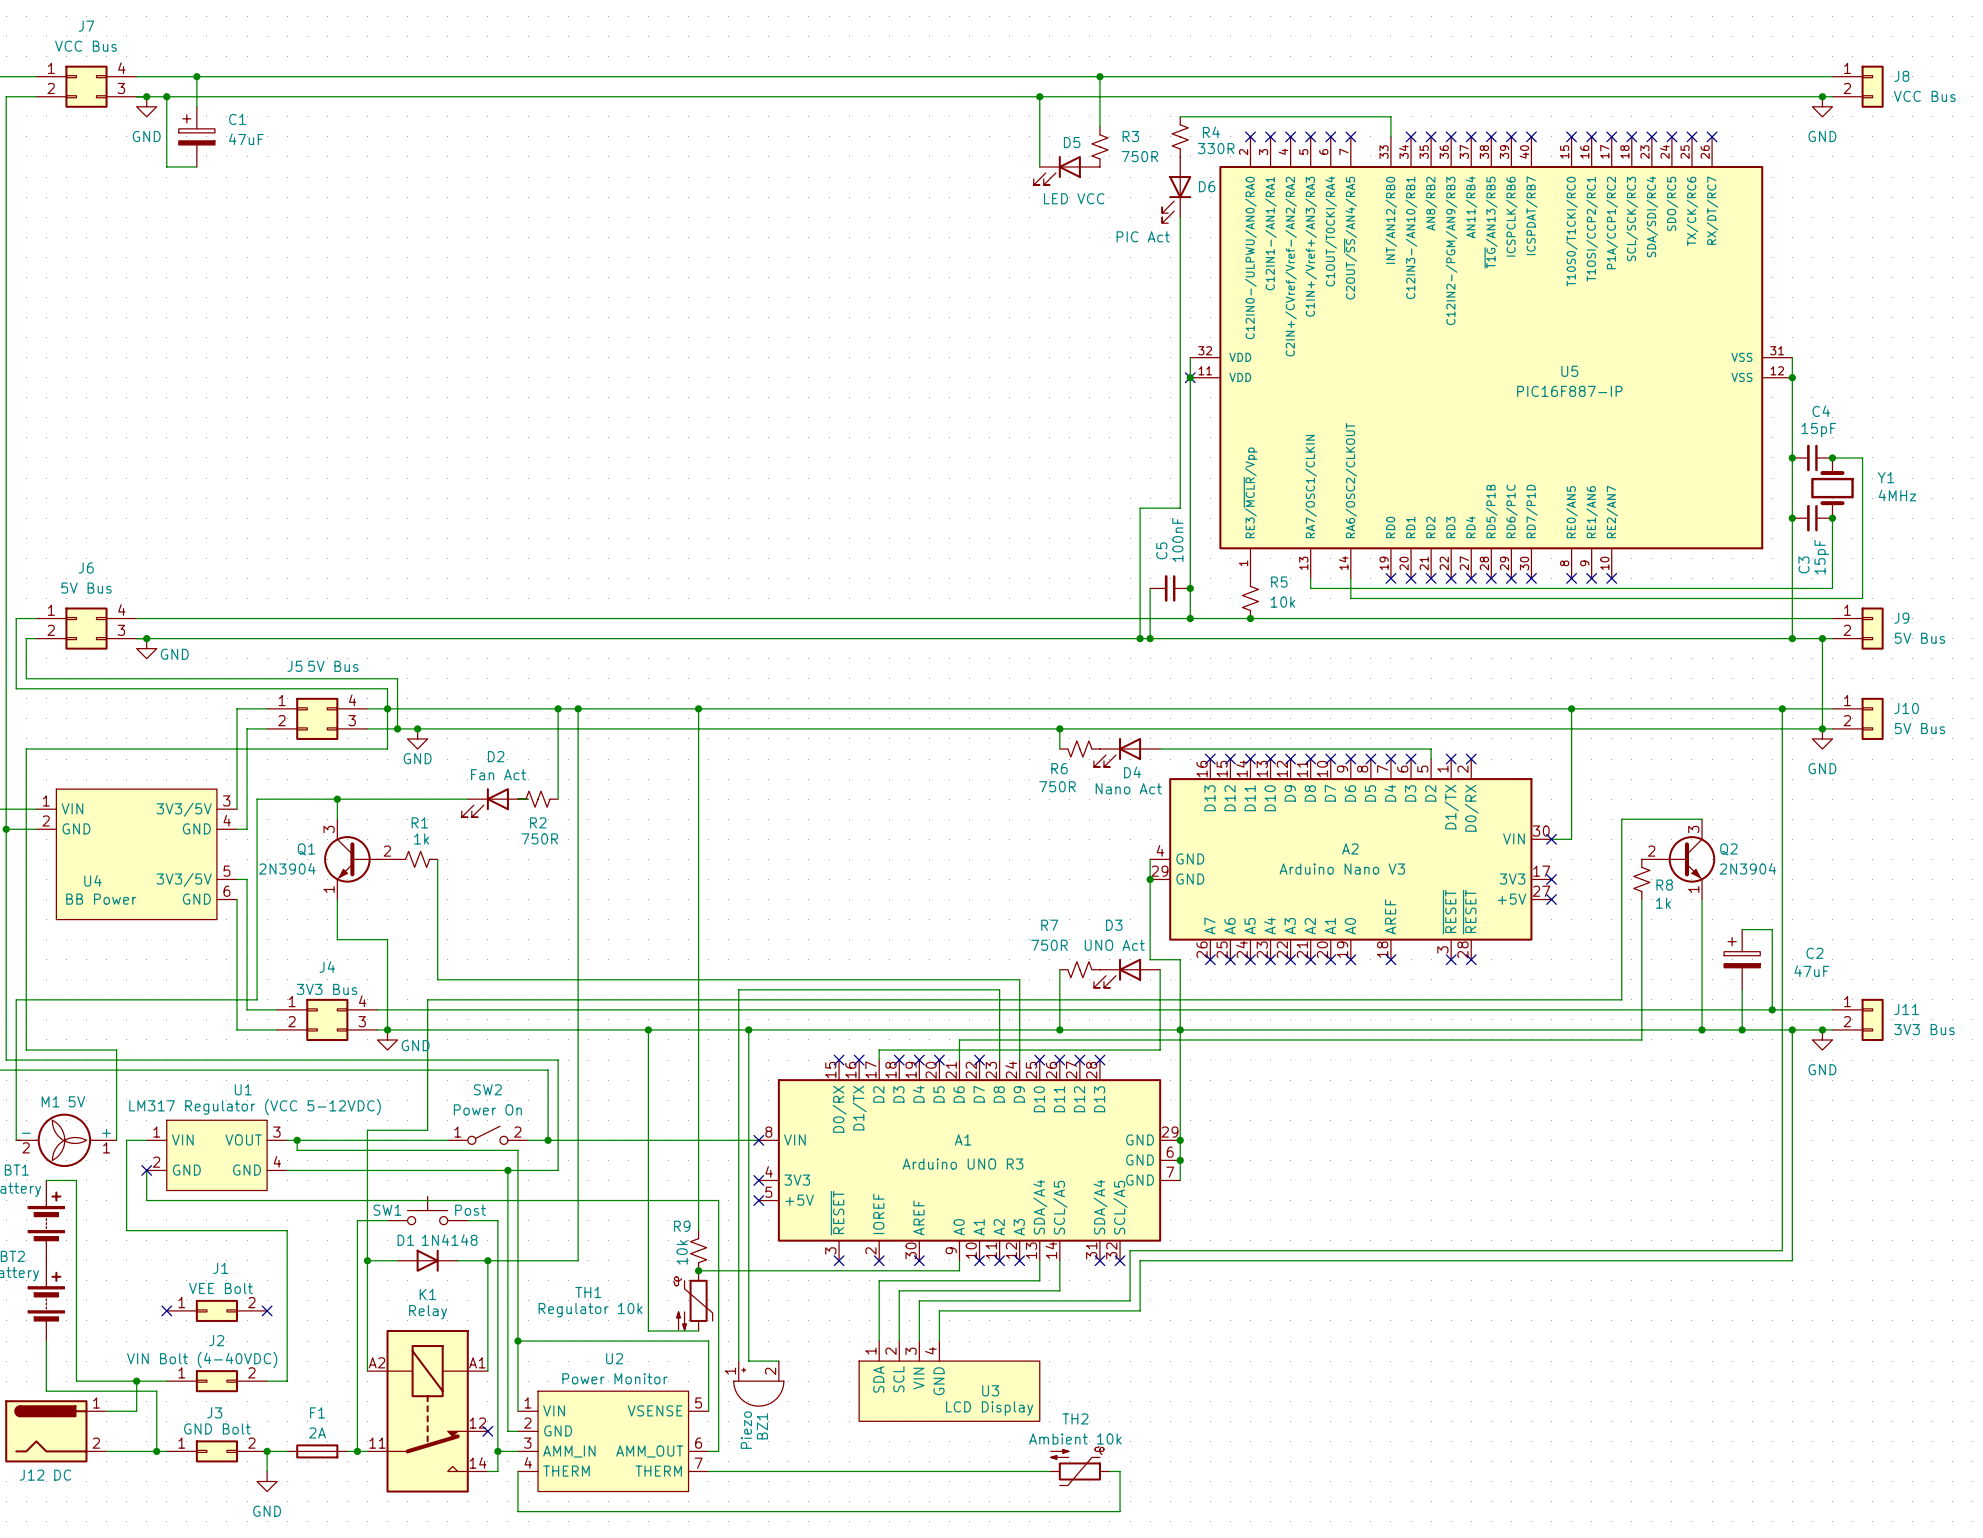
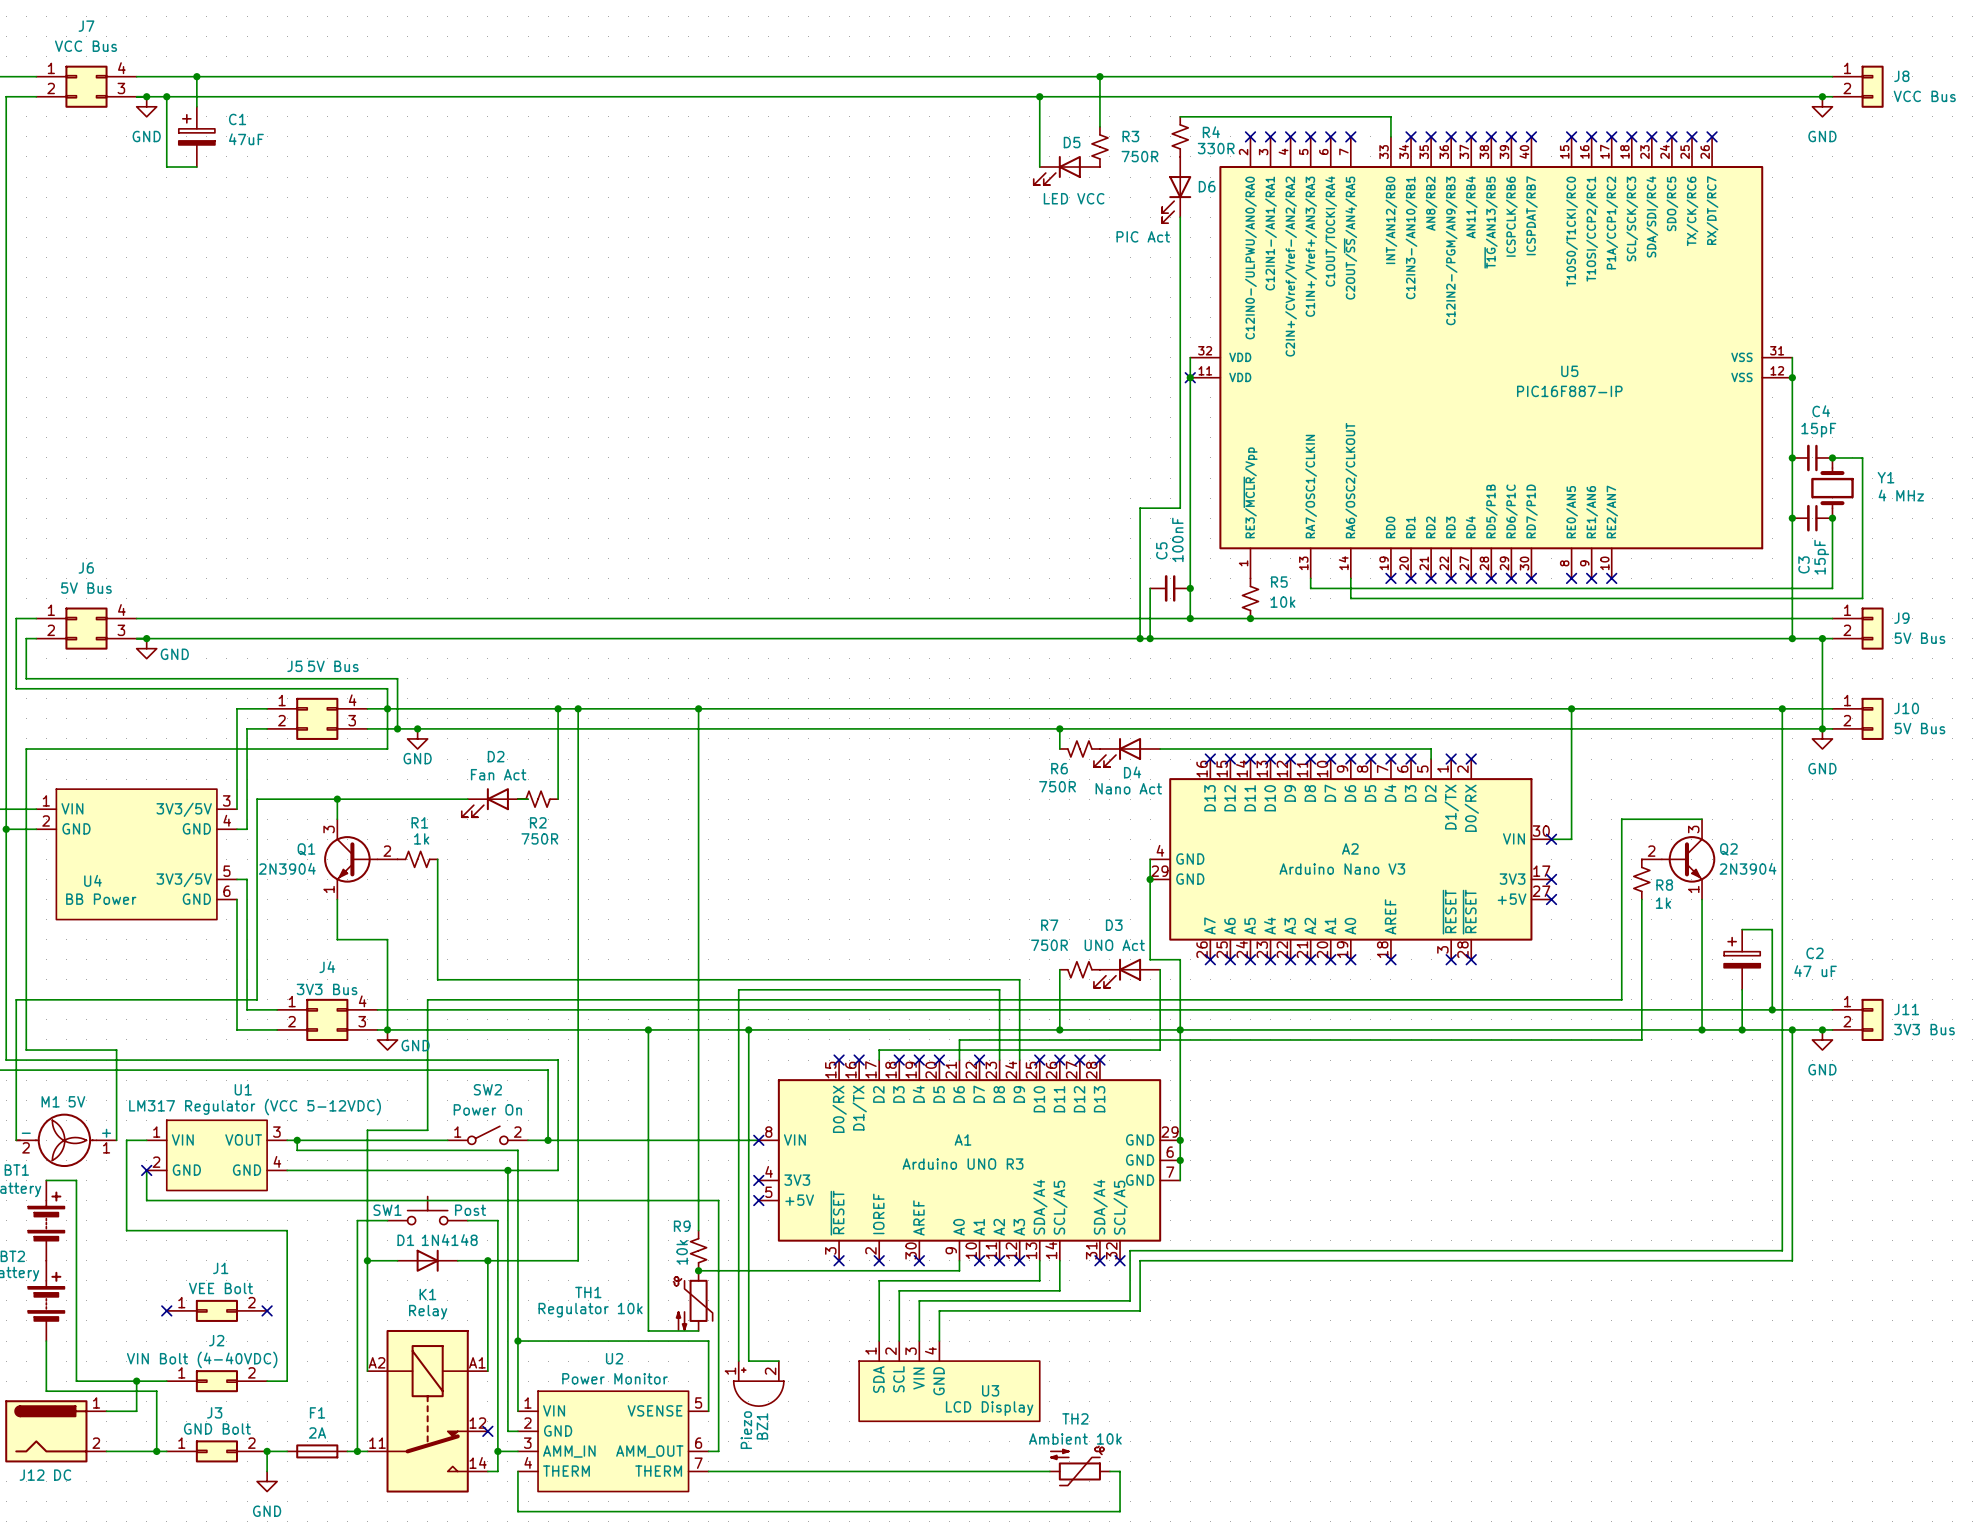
Y1 value: 4MHz (1897, 495) -> 4 MHz (1901, 495)
C2 value: 47uF (1811, 971) -> 47 uF (1815, 971)

